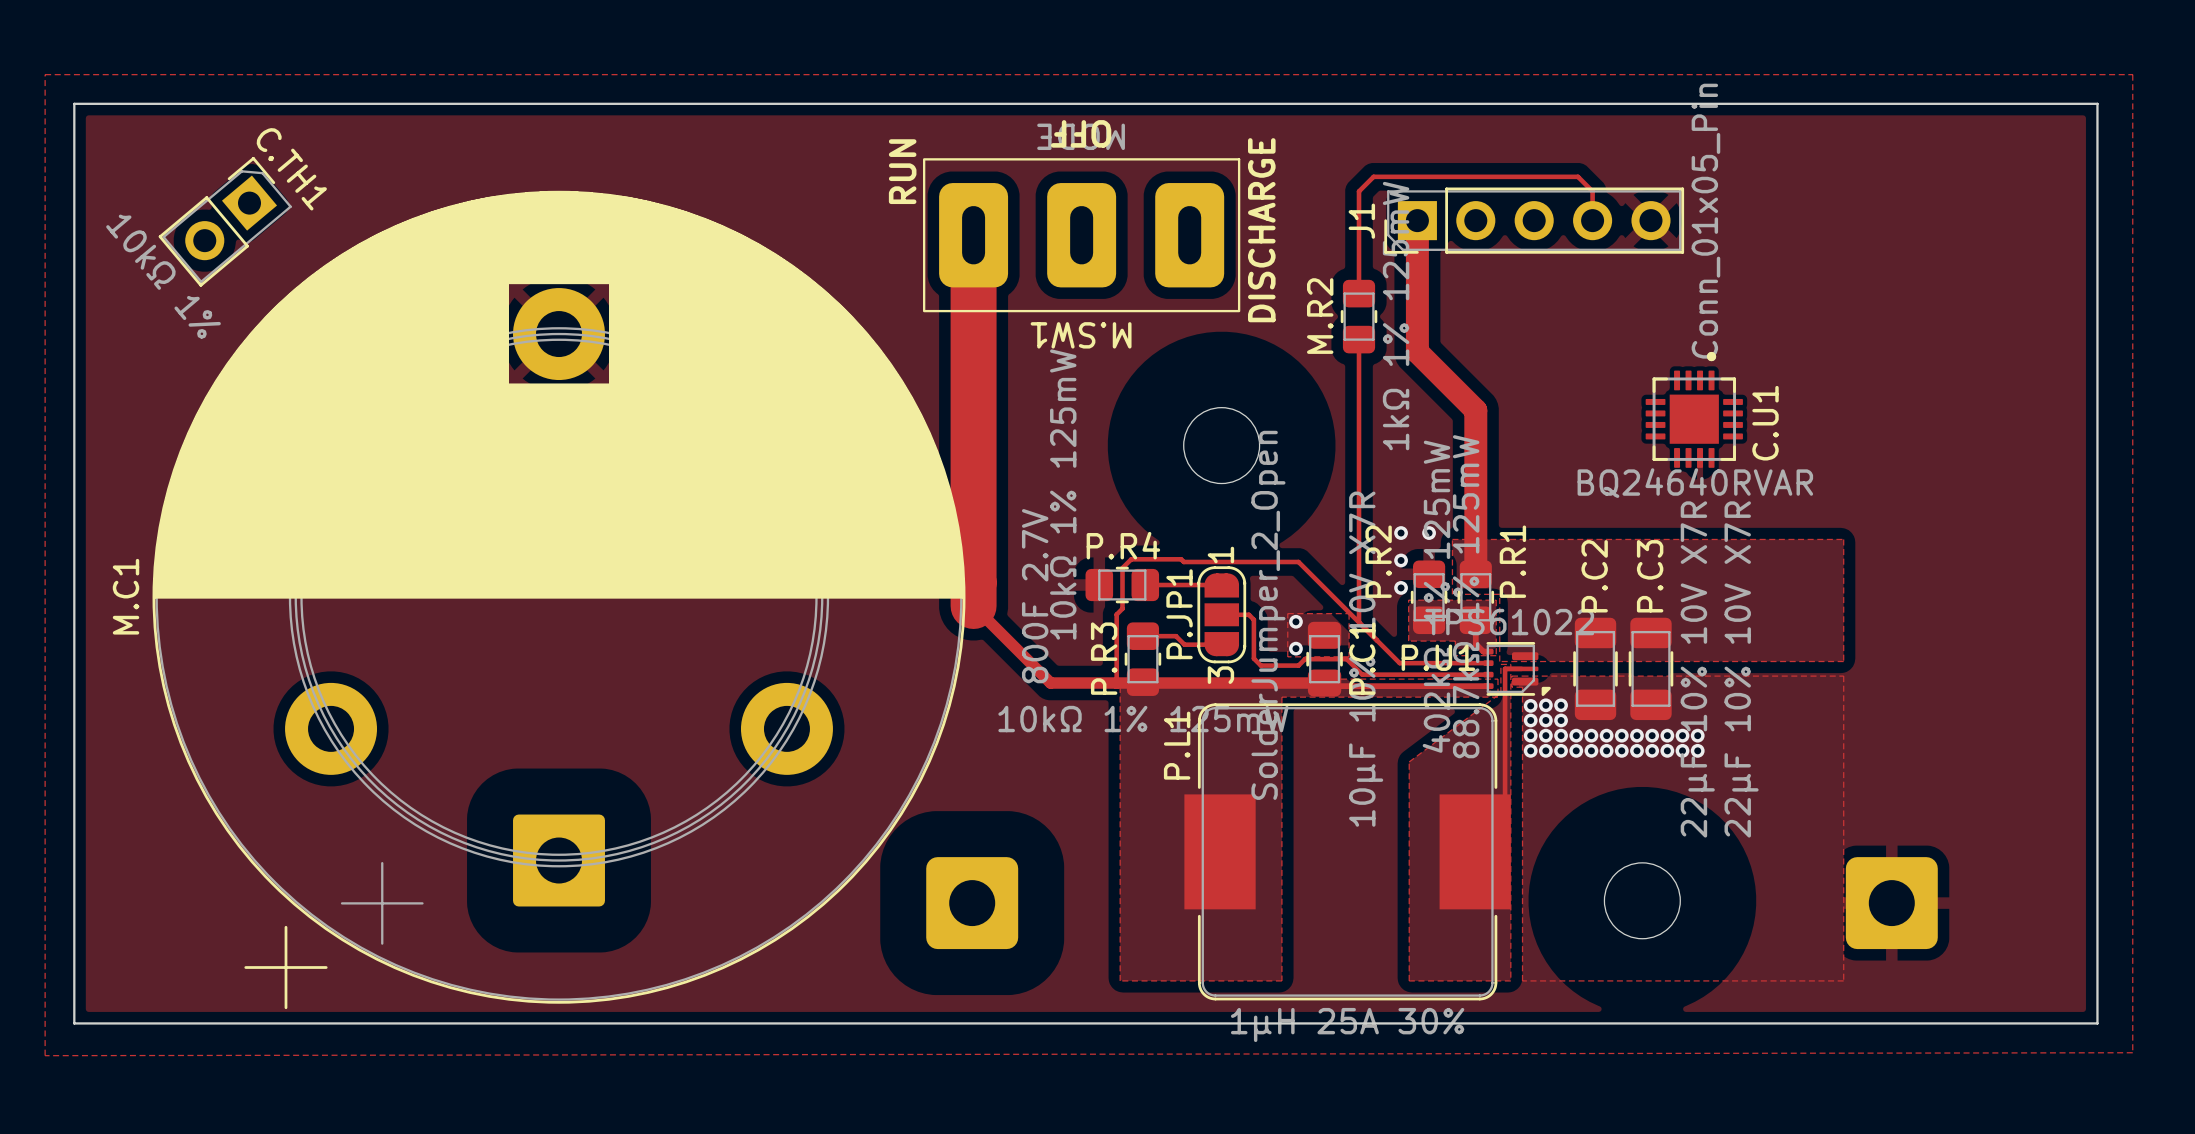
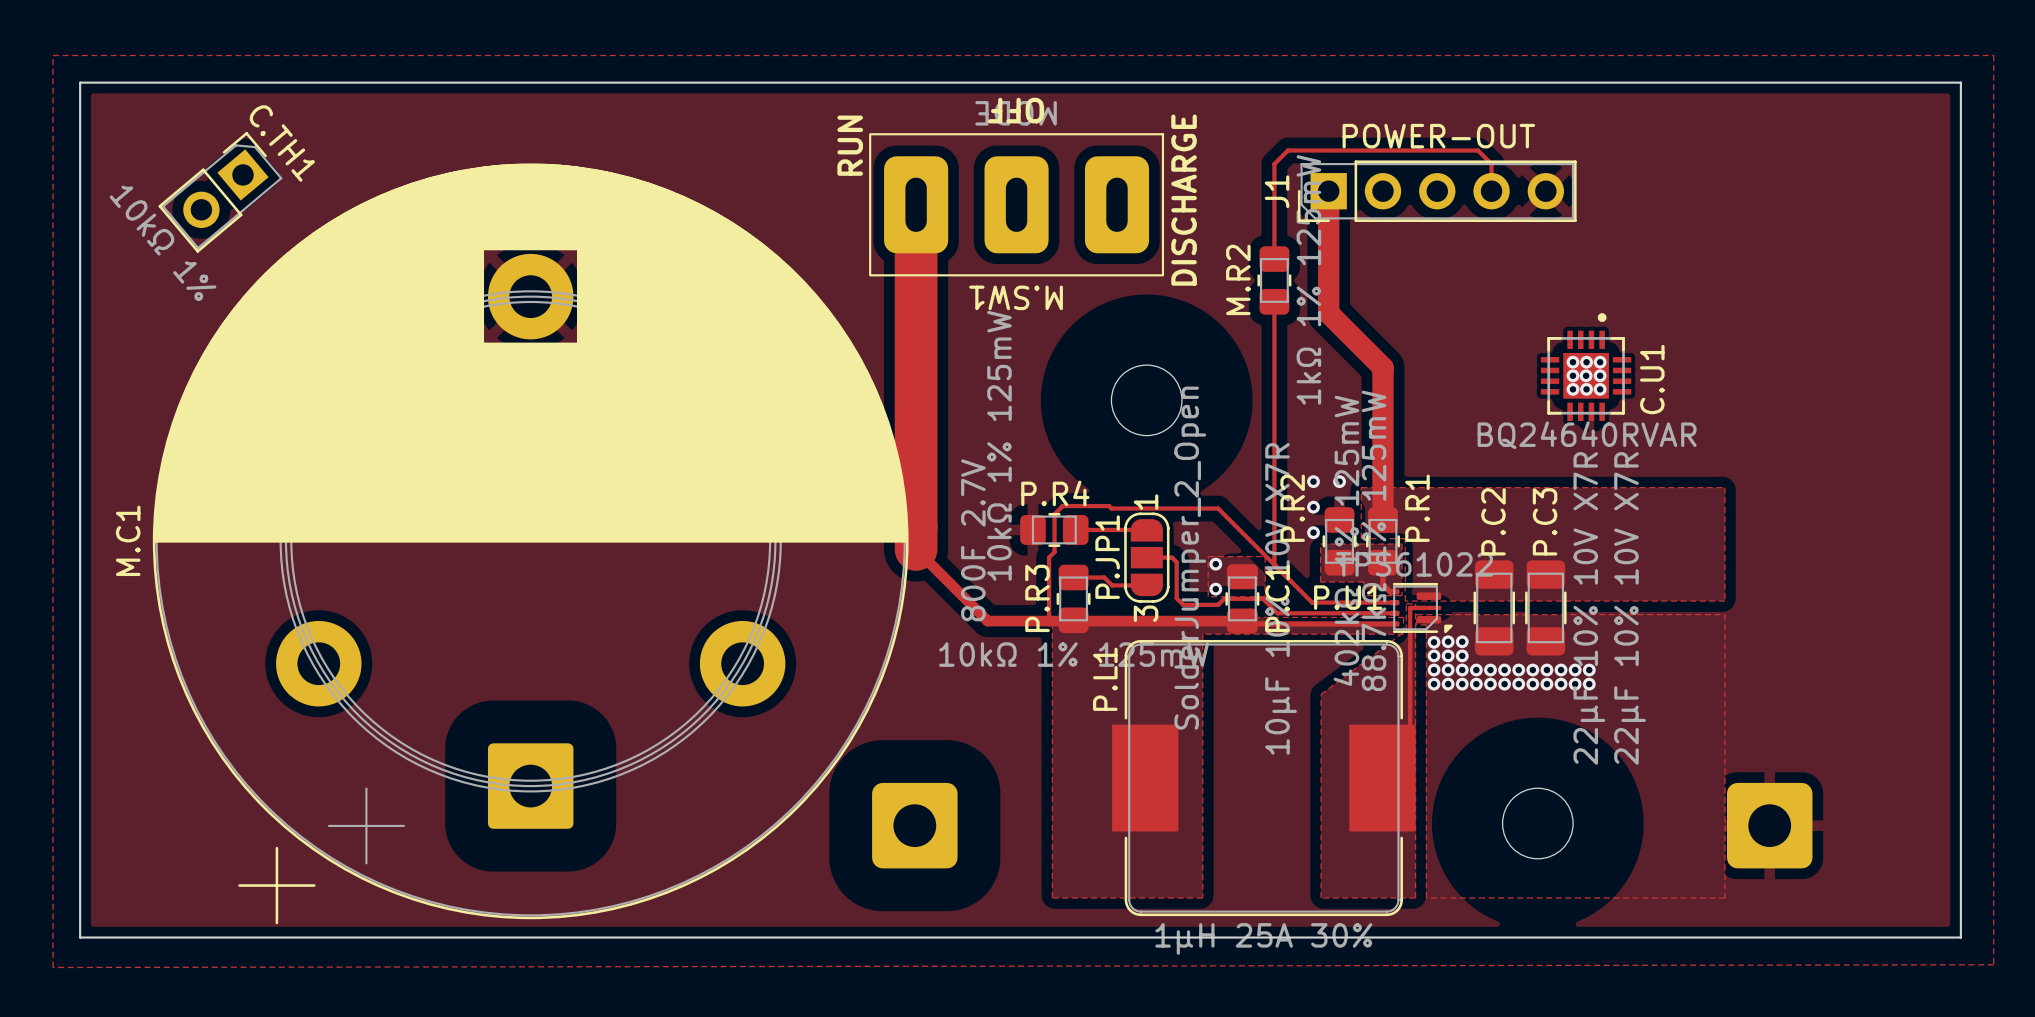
J1 value: Conn_01x05_Pin (1705, 221) -> POWER-OUT (1438, 136)
via: none -> (1572, 362)
via: none -> (1586, 362)
via: none -> (1600, 362)
via: none -> (1572, 375)
via: none -> (1586, 375)
via: none -> (1600, 375)
via: none -> (1572, 389)
via: none -> (1586, 389)
via: none -> (1600, 389)

